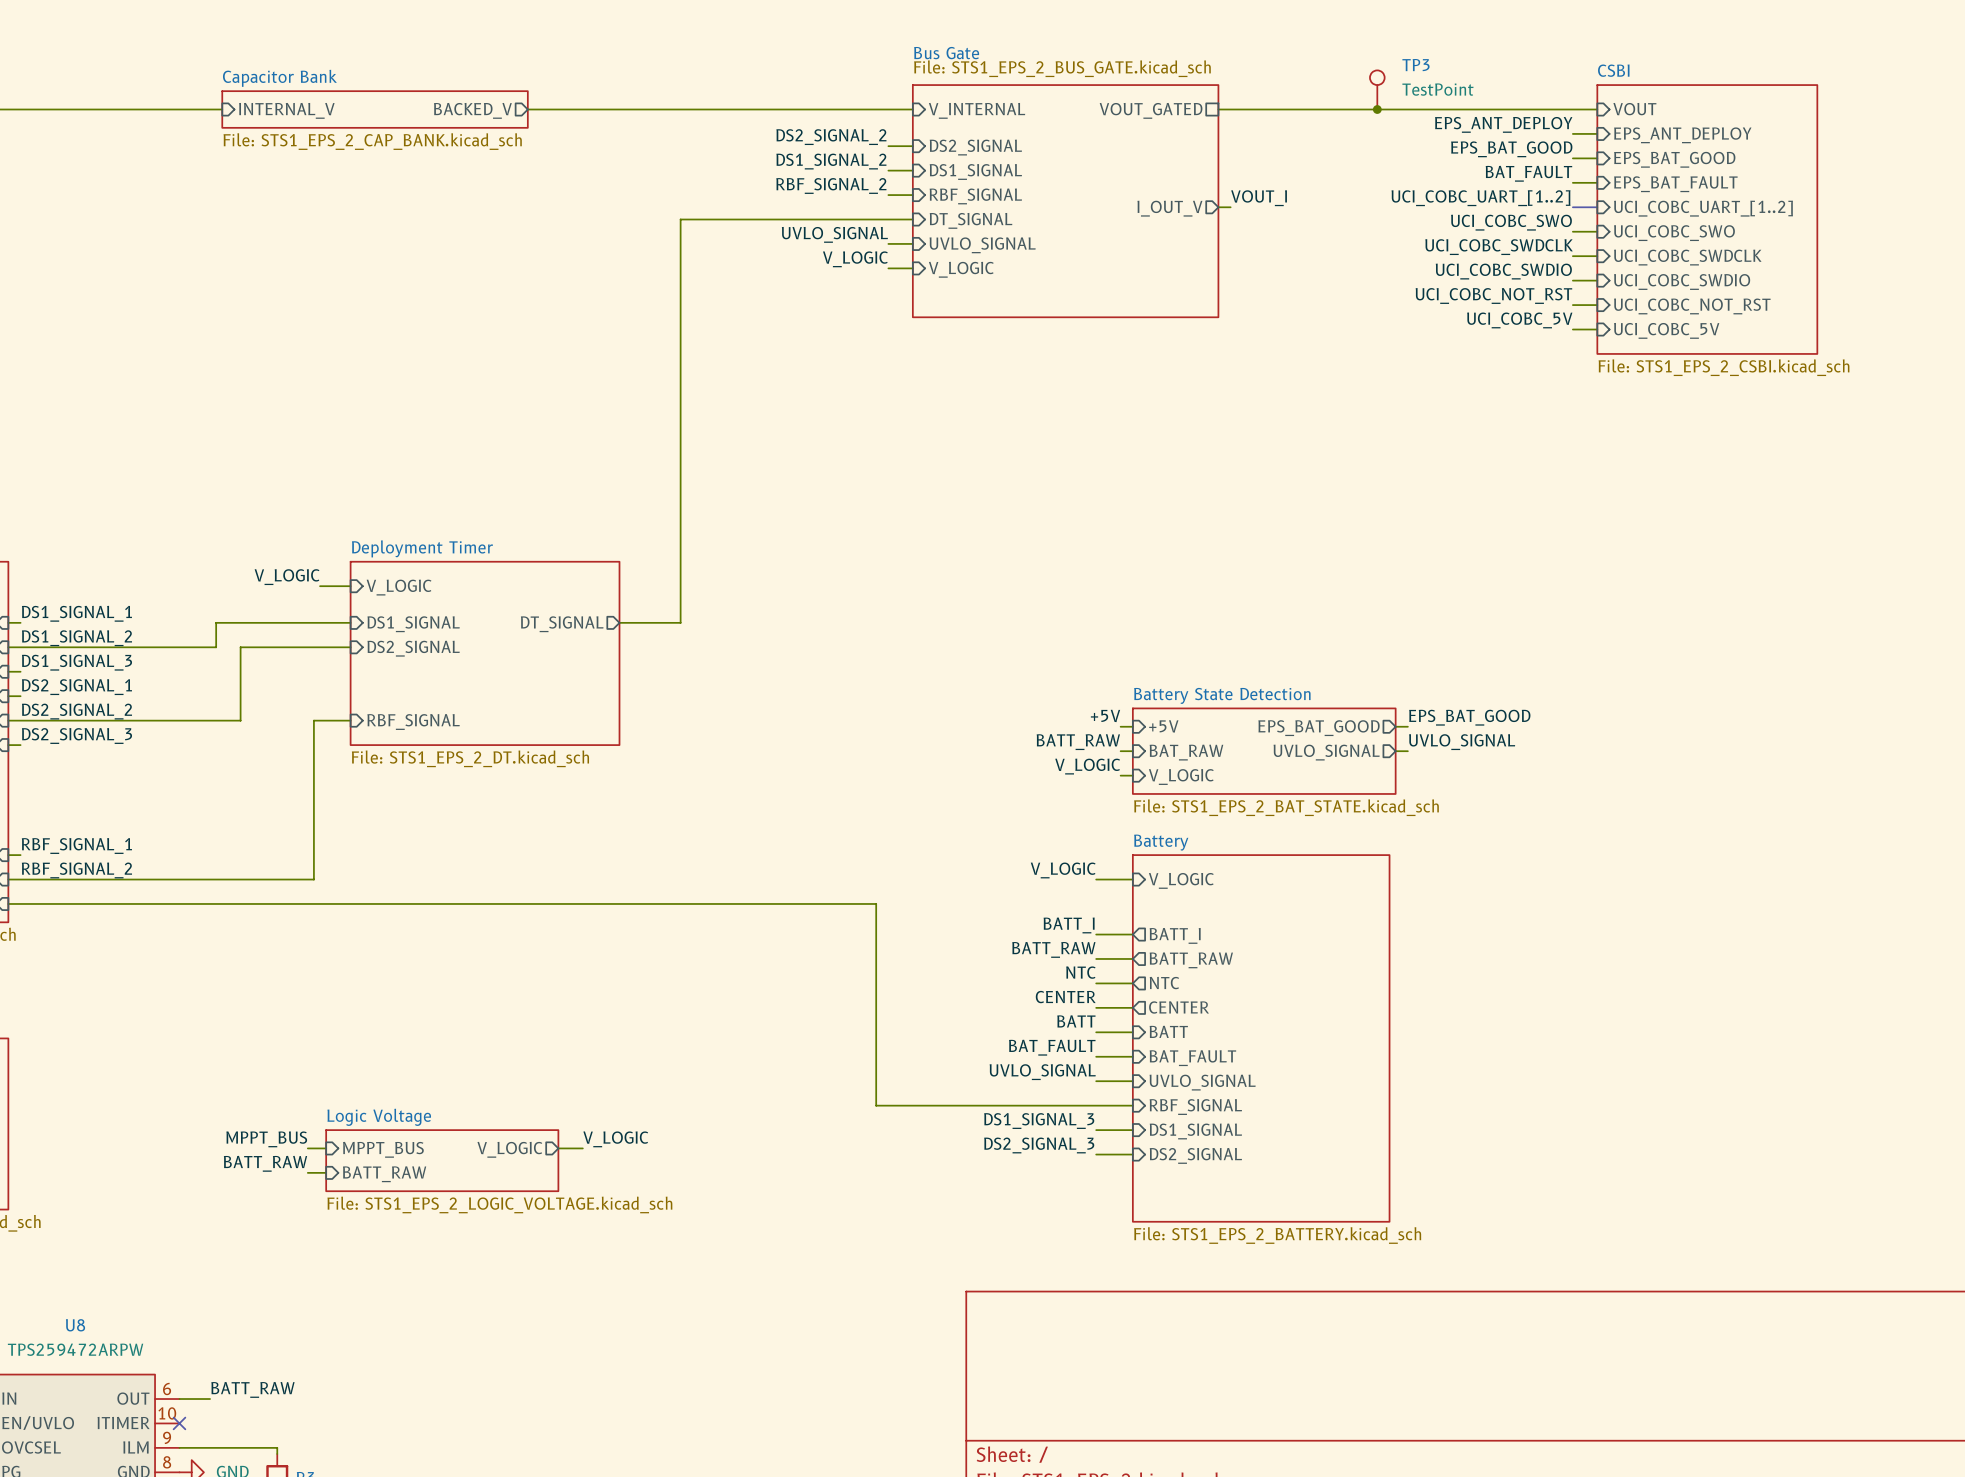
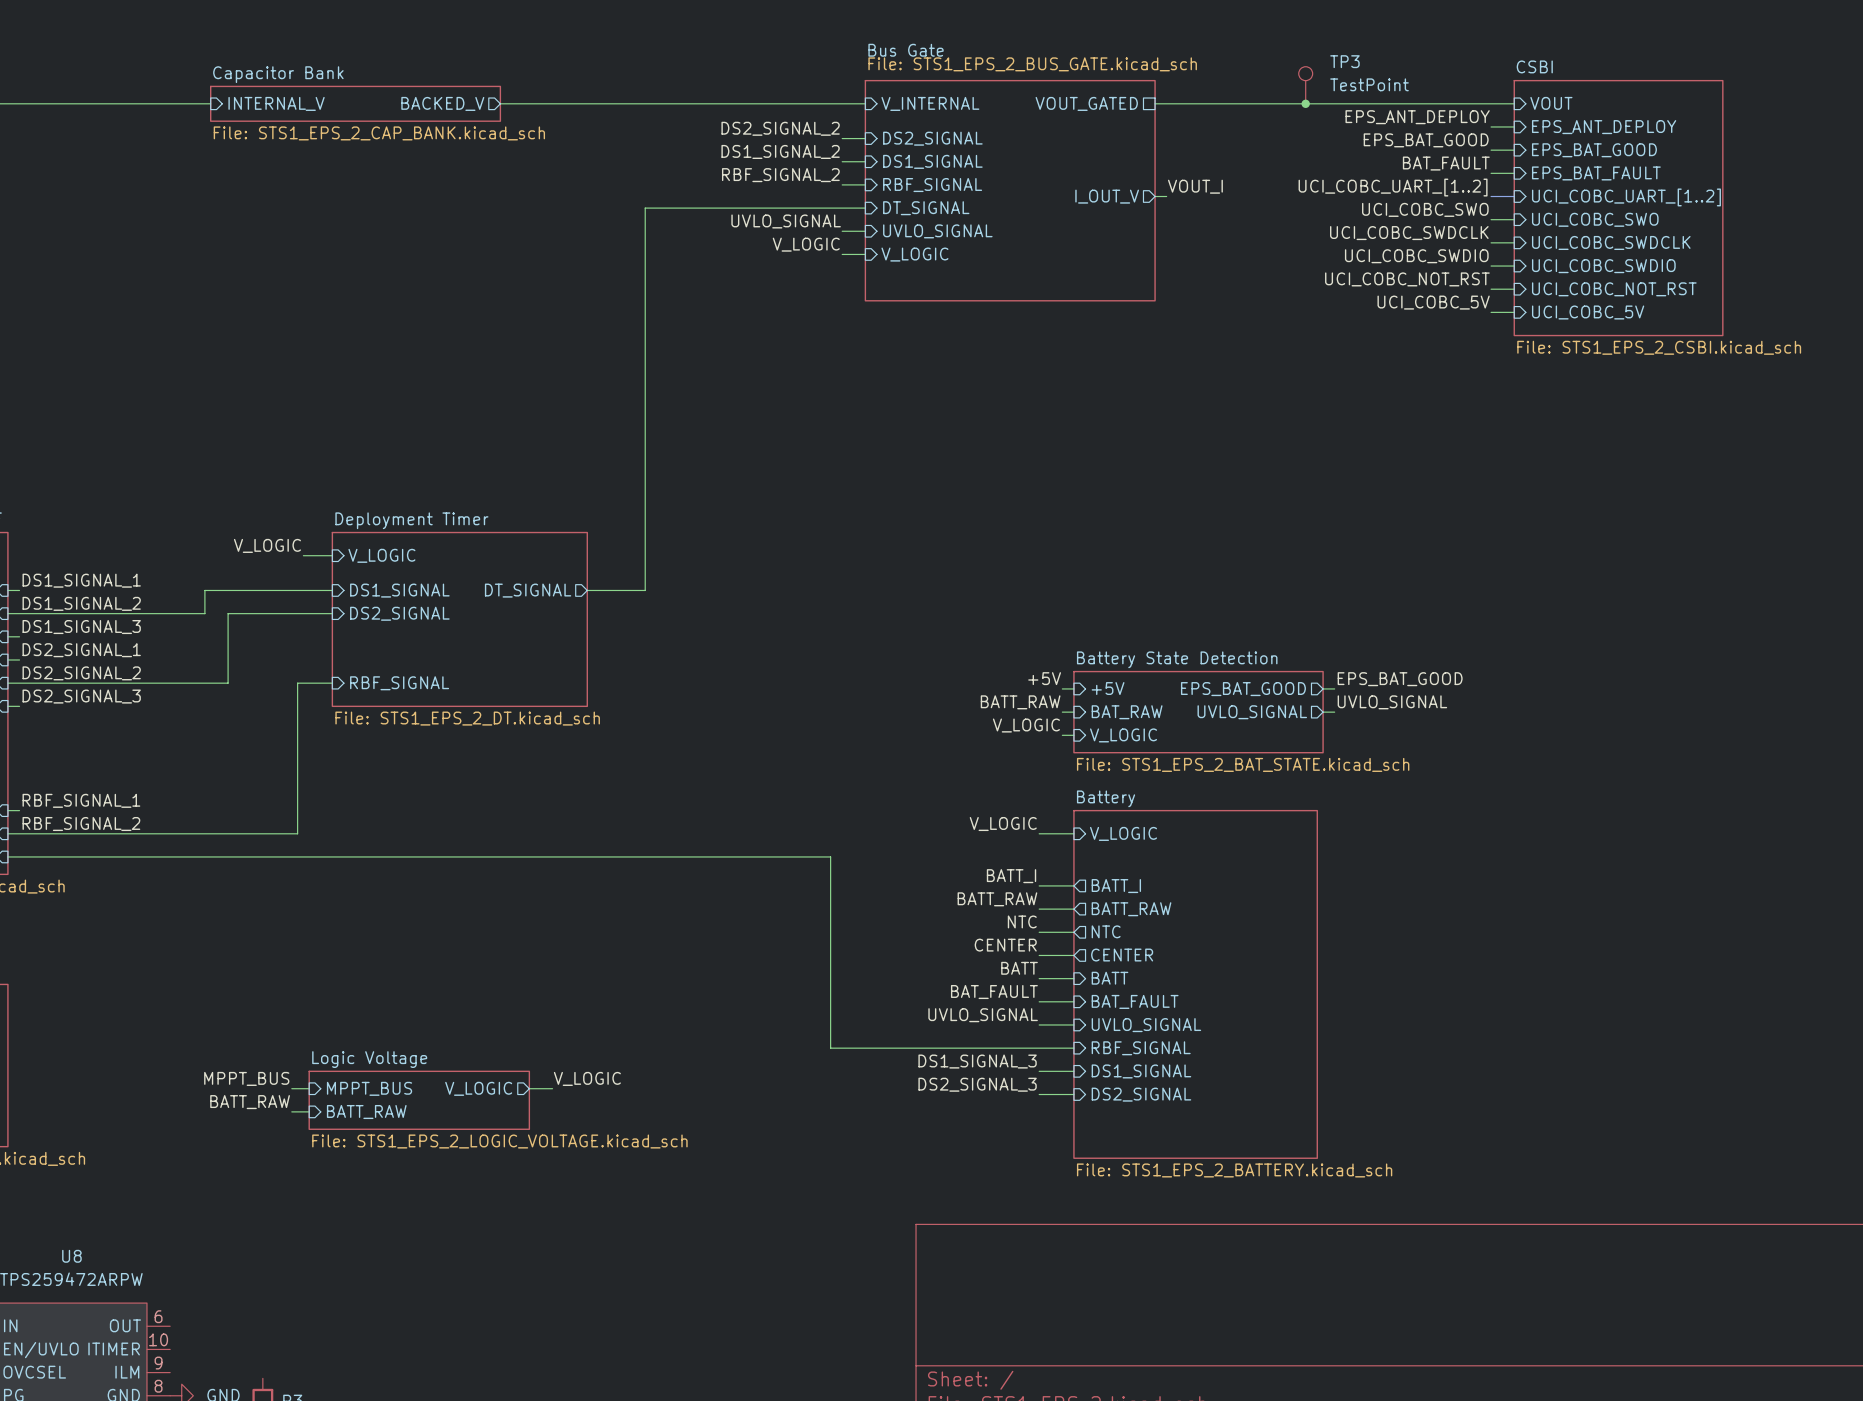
label: BATT_RAW (252, 1389) -> none
wire: (179, 1399) (210, 1399) -> none
no-connect mark: (179, 1423) -> none
wire: (179, 1447) (277, 1447) (277, 1454) -> none

